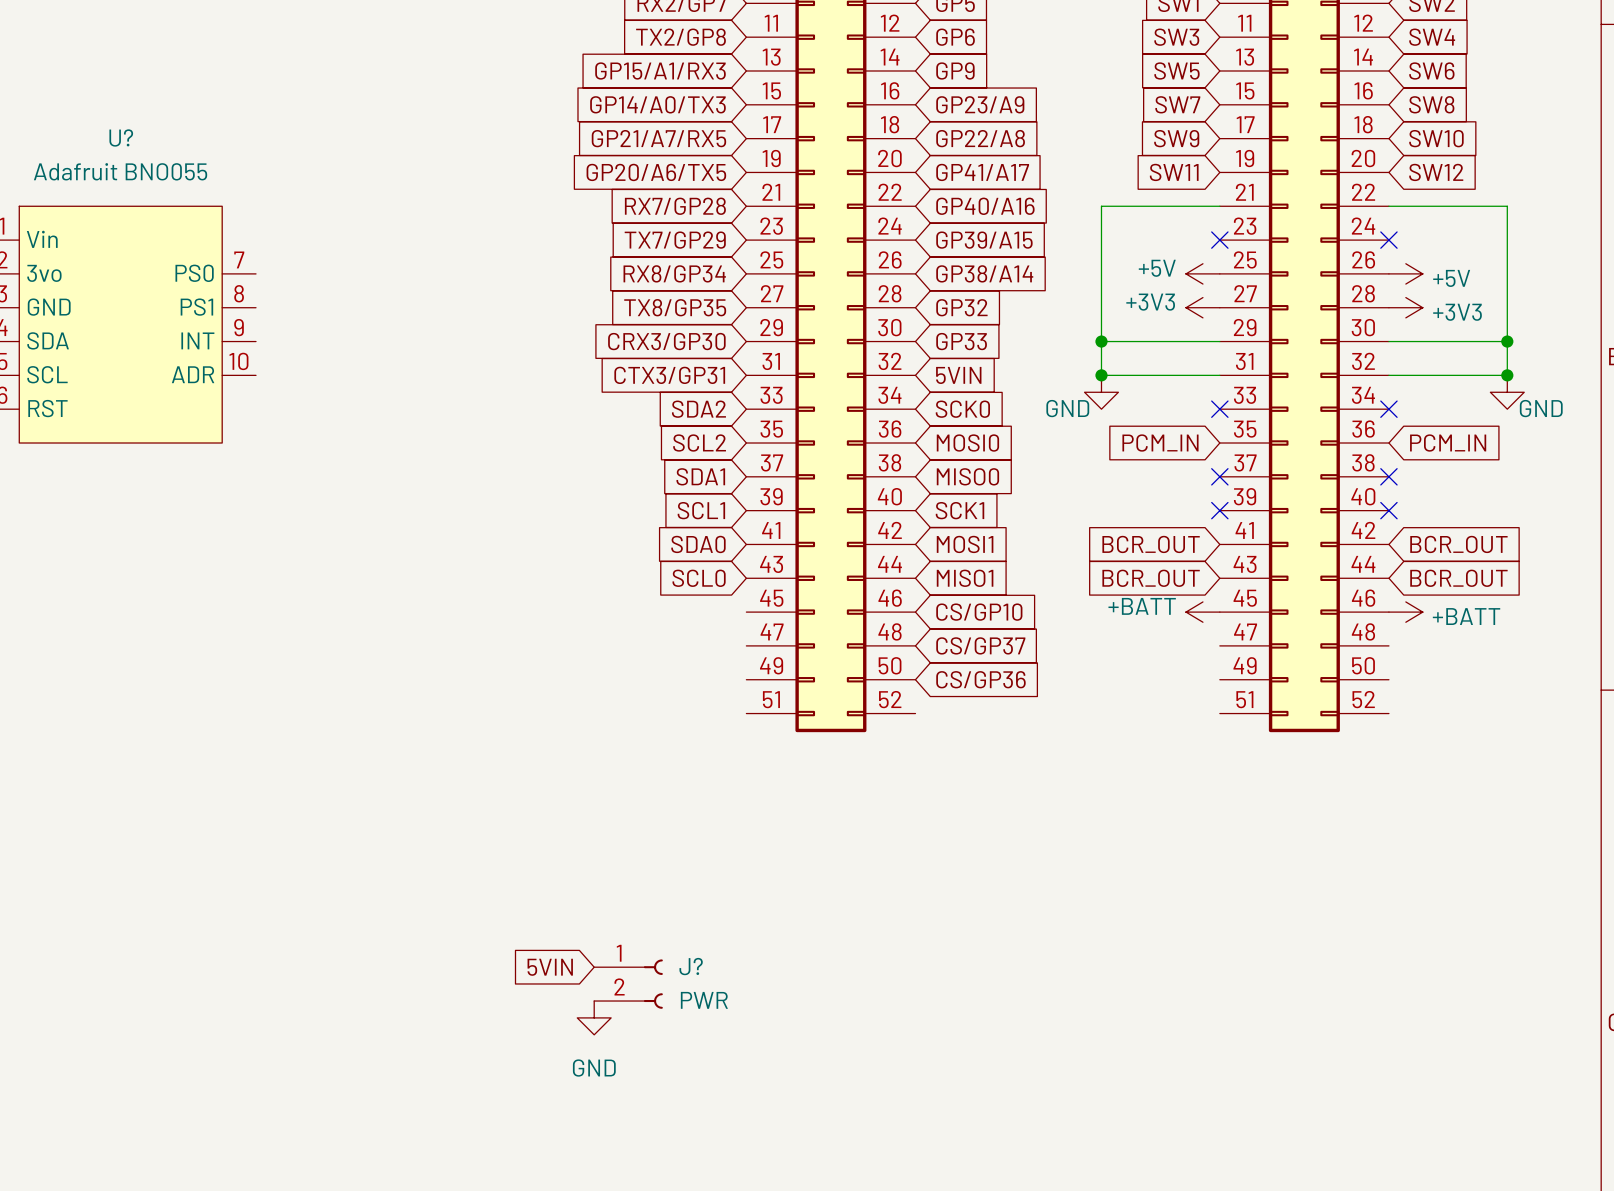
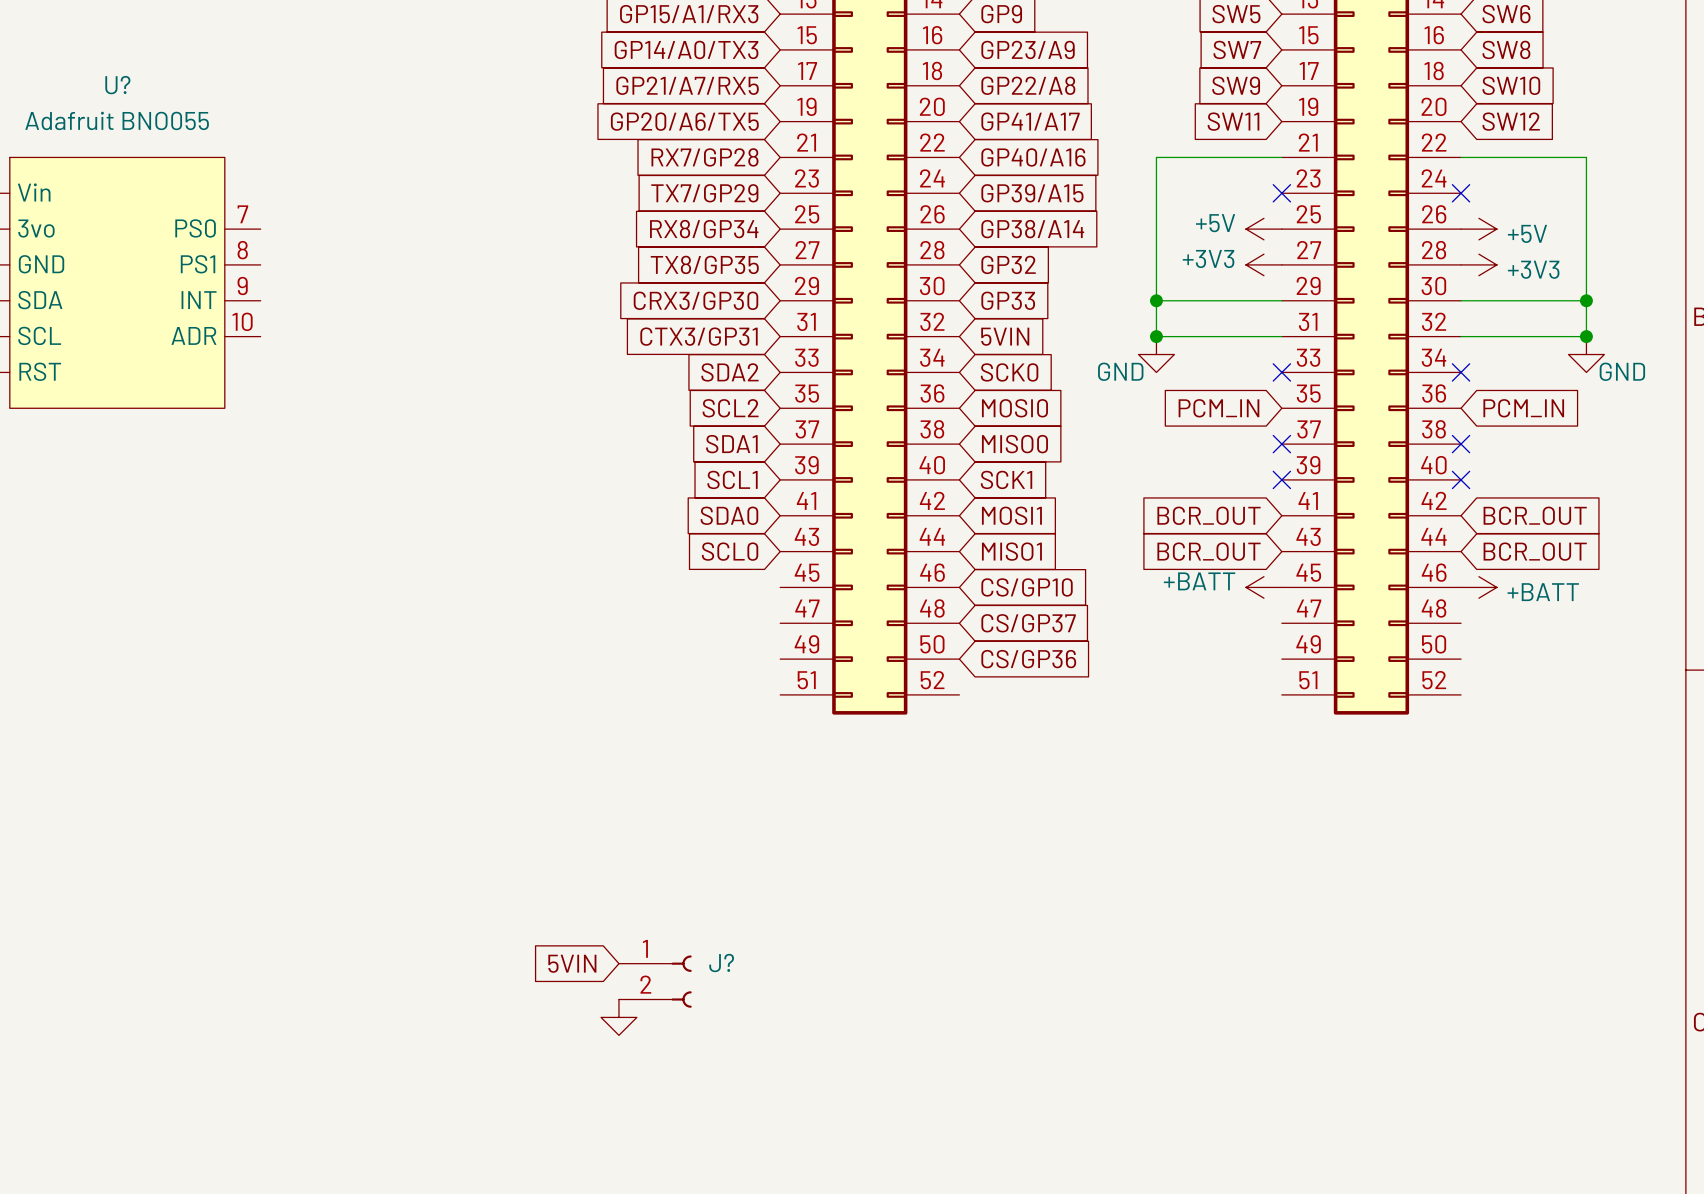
J? value: PWR (704, 1000) -> none
power symbol text: GND (594, 1068) -> none

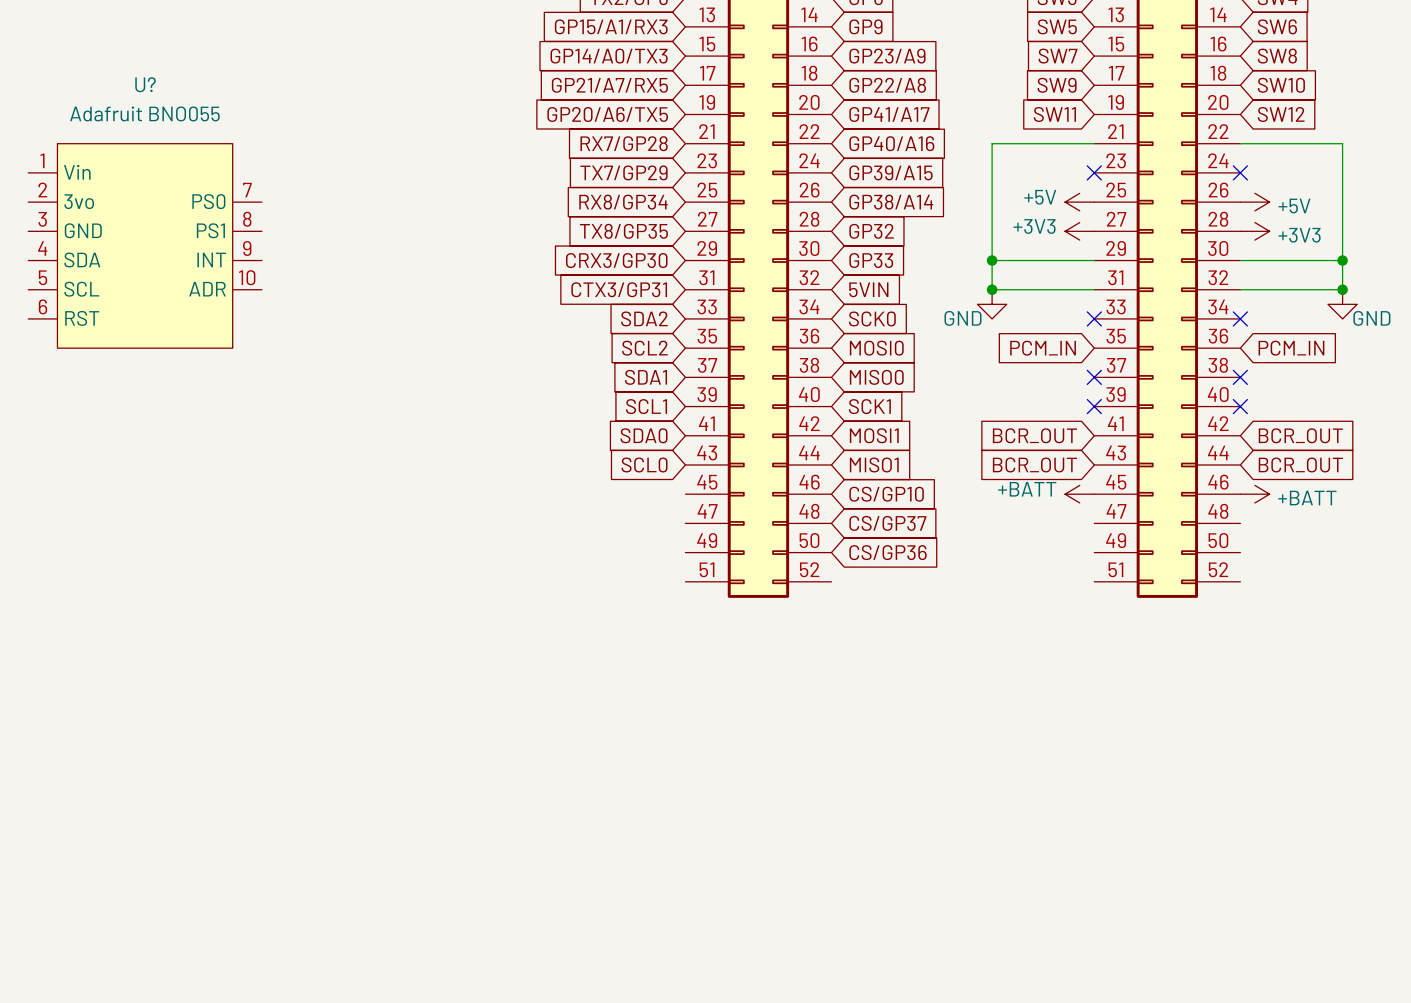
global label: 5VIN (572, 963) -> none
J?: (655, 981) -> none
power symbol: (618, 1017) -> none

